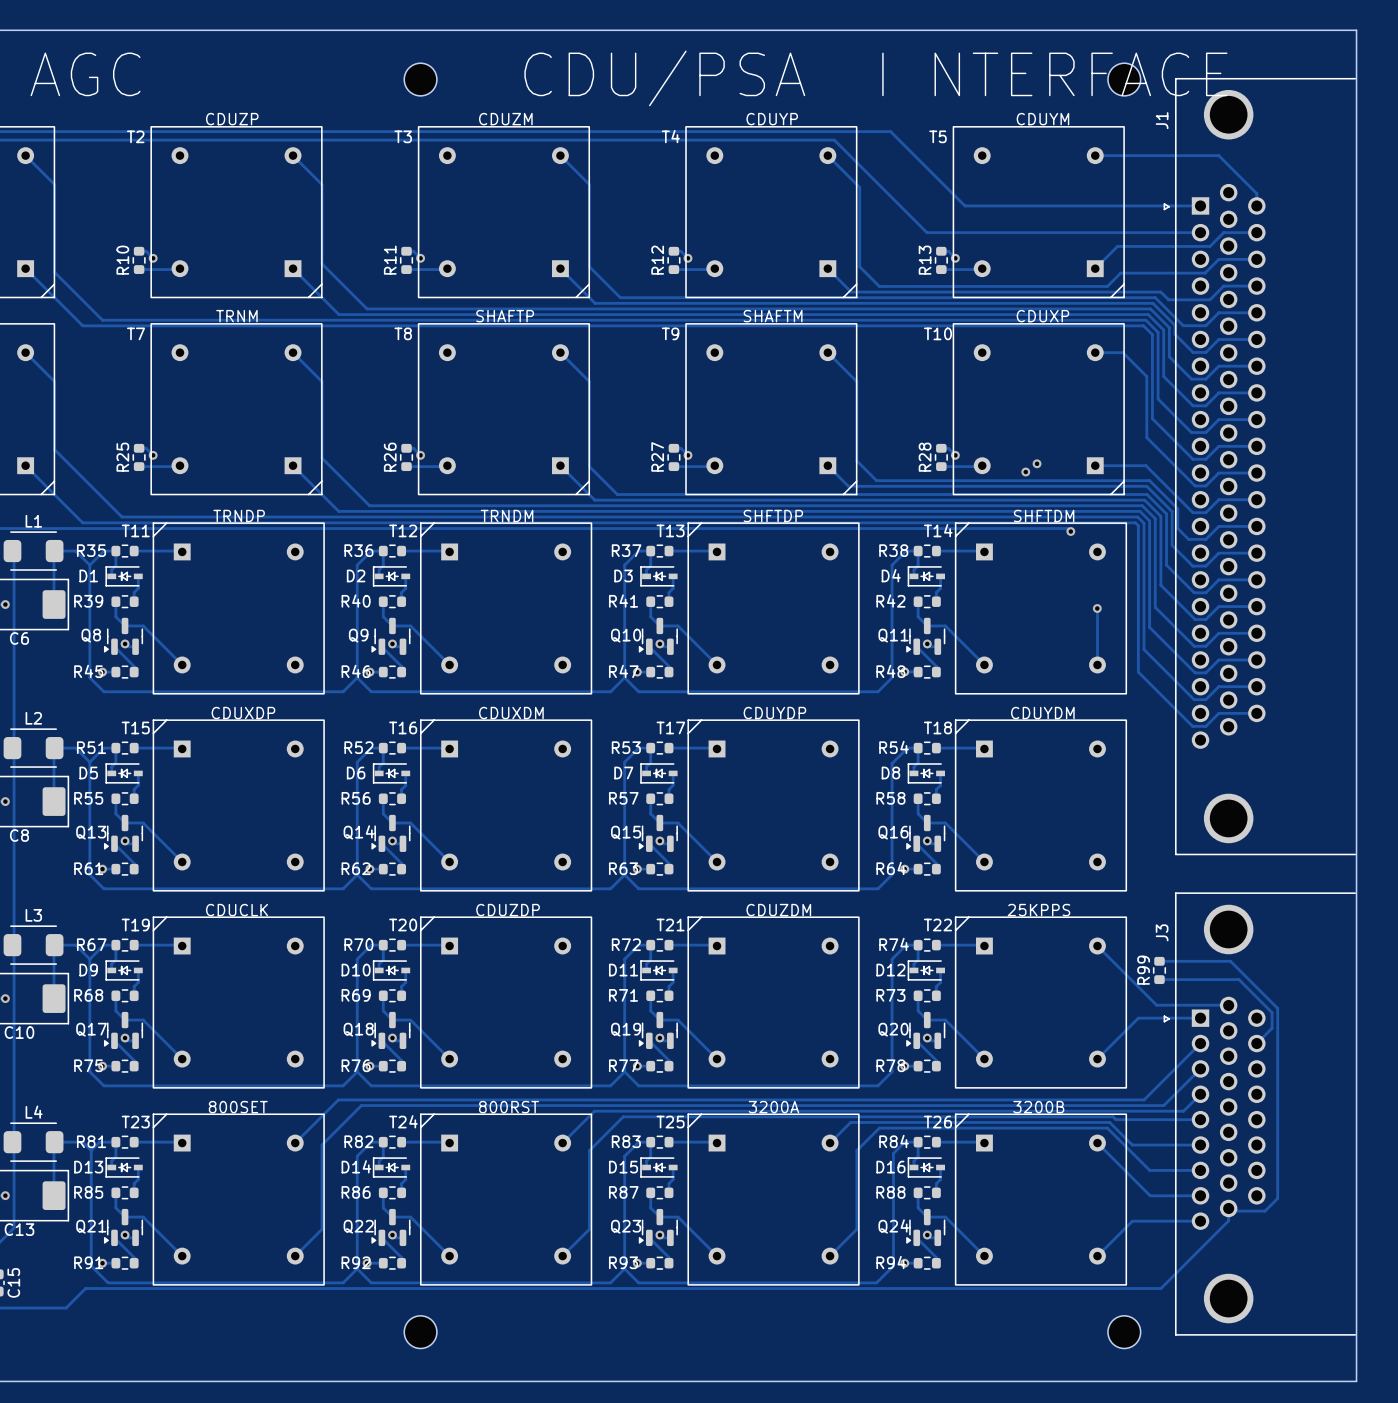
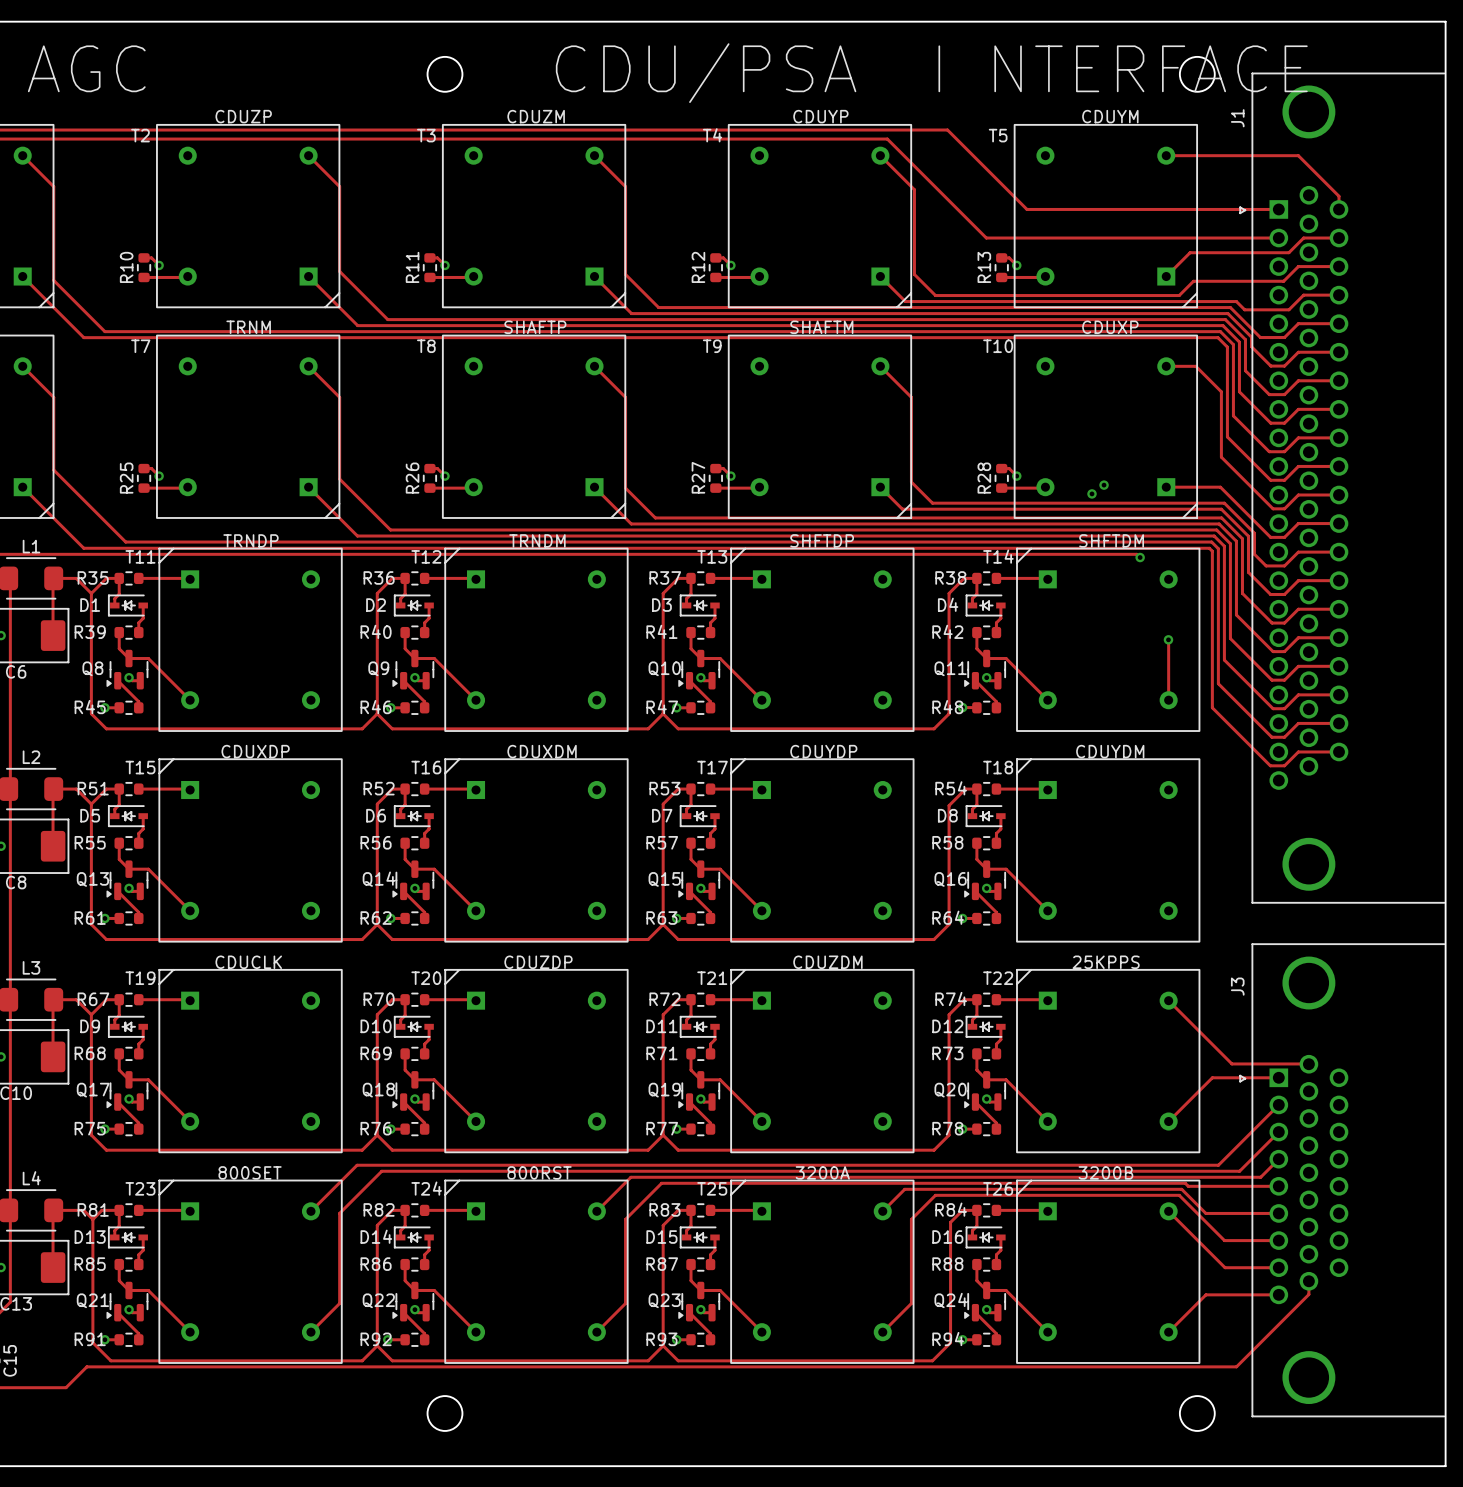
track: (1159, 961) (1230, 961) (1277, 1008) (1277, 1198) (1265, 1211) (1231, 1211) (1228, 1208) -> none
R99: (1159, 970) -> none
track: (1159, 979) (1239, 979) (1272, 1012) (1272, 1028) (1256, 1043) -> none

